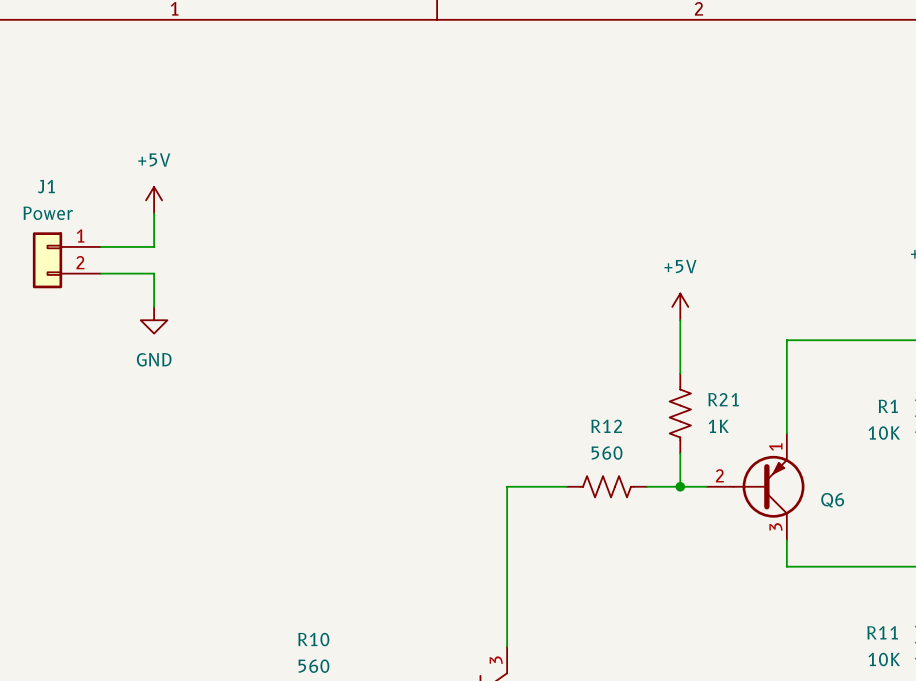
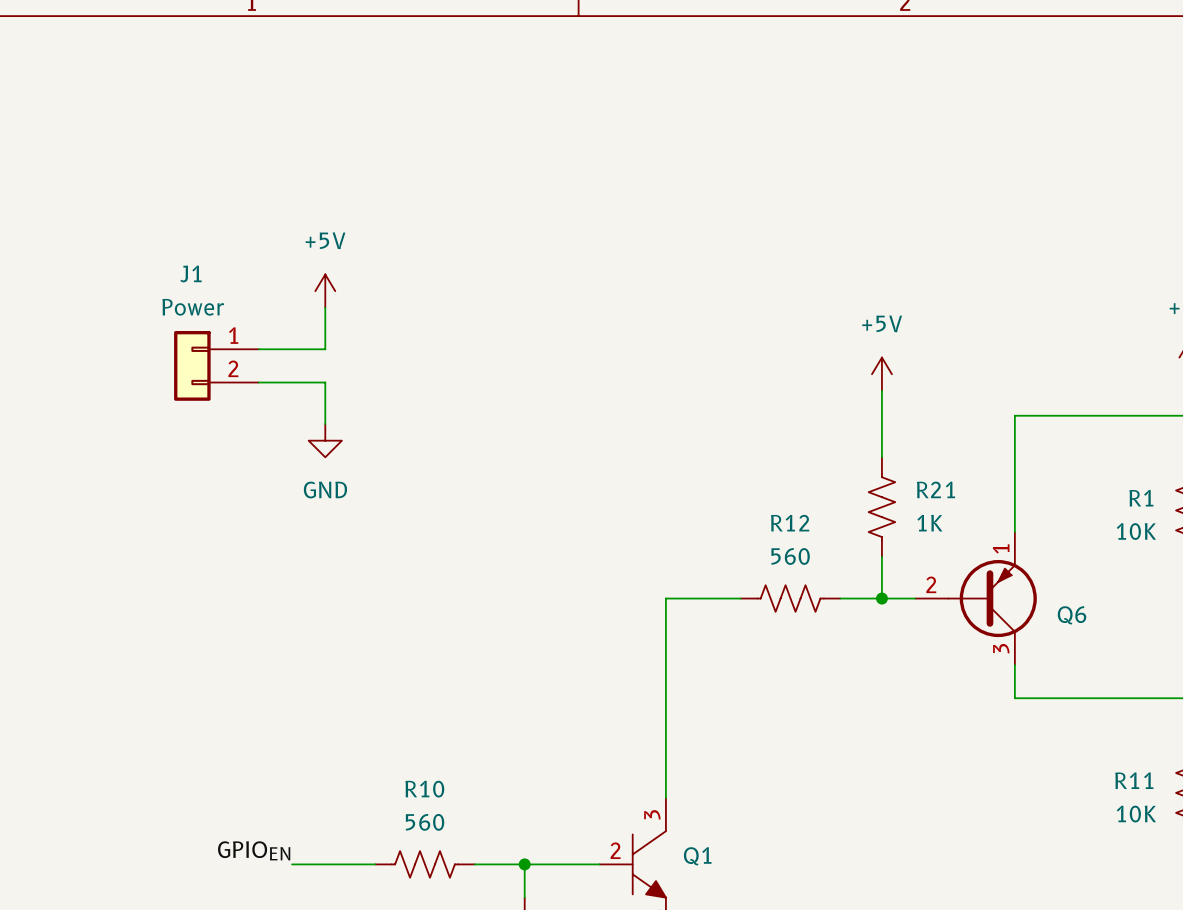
power symbol position: +5V (154, 200) -> +5V (325, 291)
wire: (154, 213) (154, 246) (100, 246) -> (325, 307) (325, 349) (258, 349)
J1 position: (66, 260) -> (216, 365)
wire: (100, 273) (154, 273) (154, 306) -> (258, 382) (325, 382) (325, 424)
power symbol position: GND (154, 320) -> GND (325, 440)

